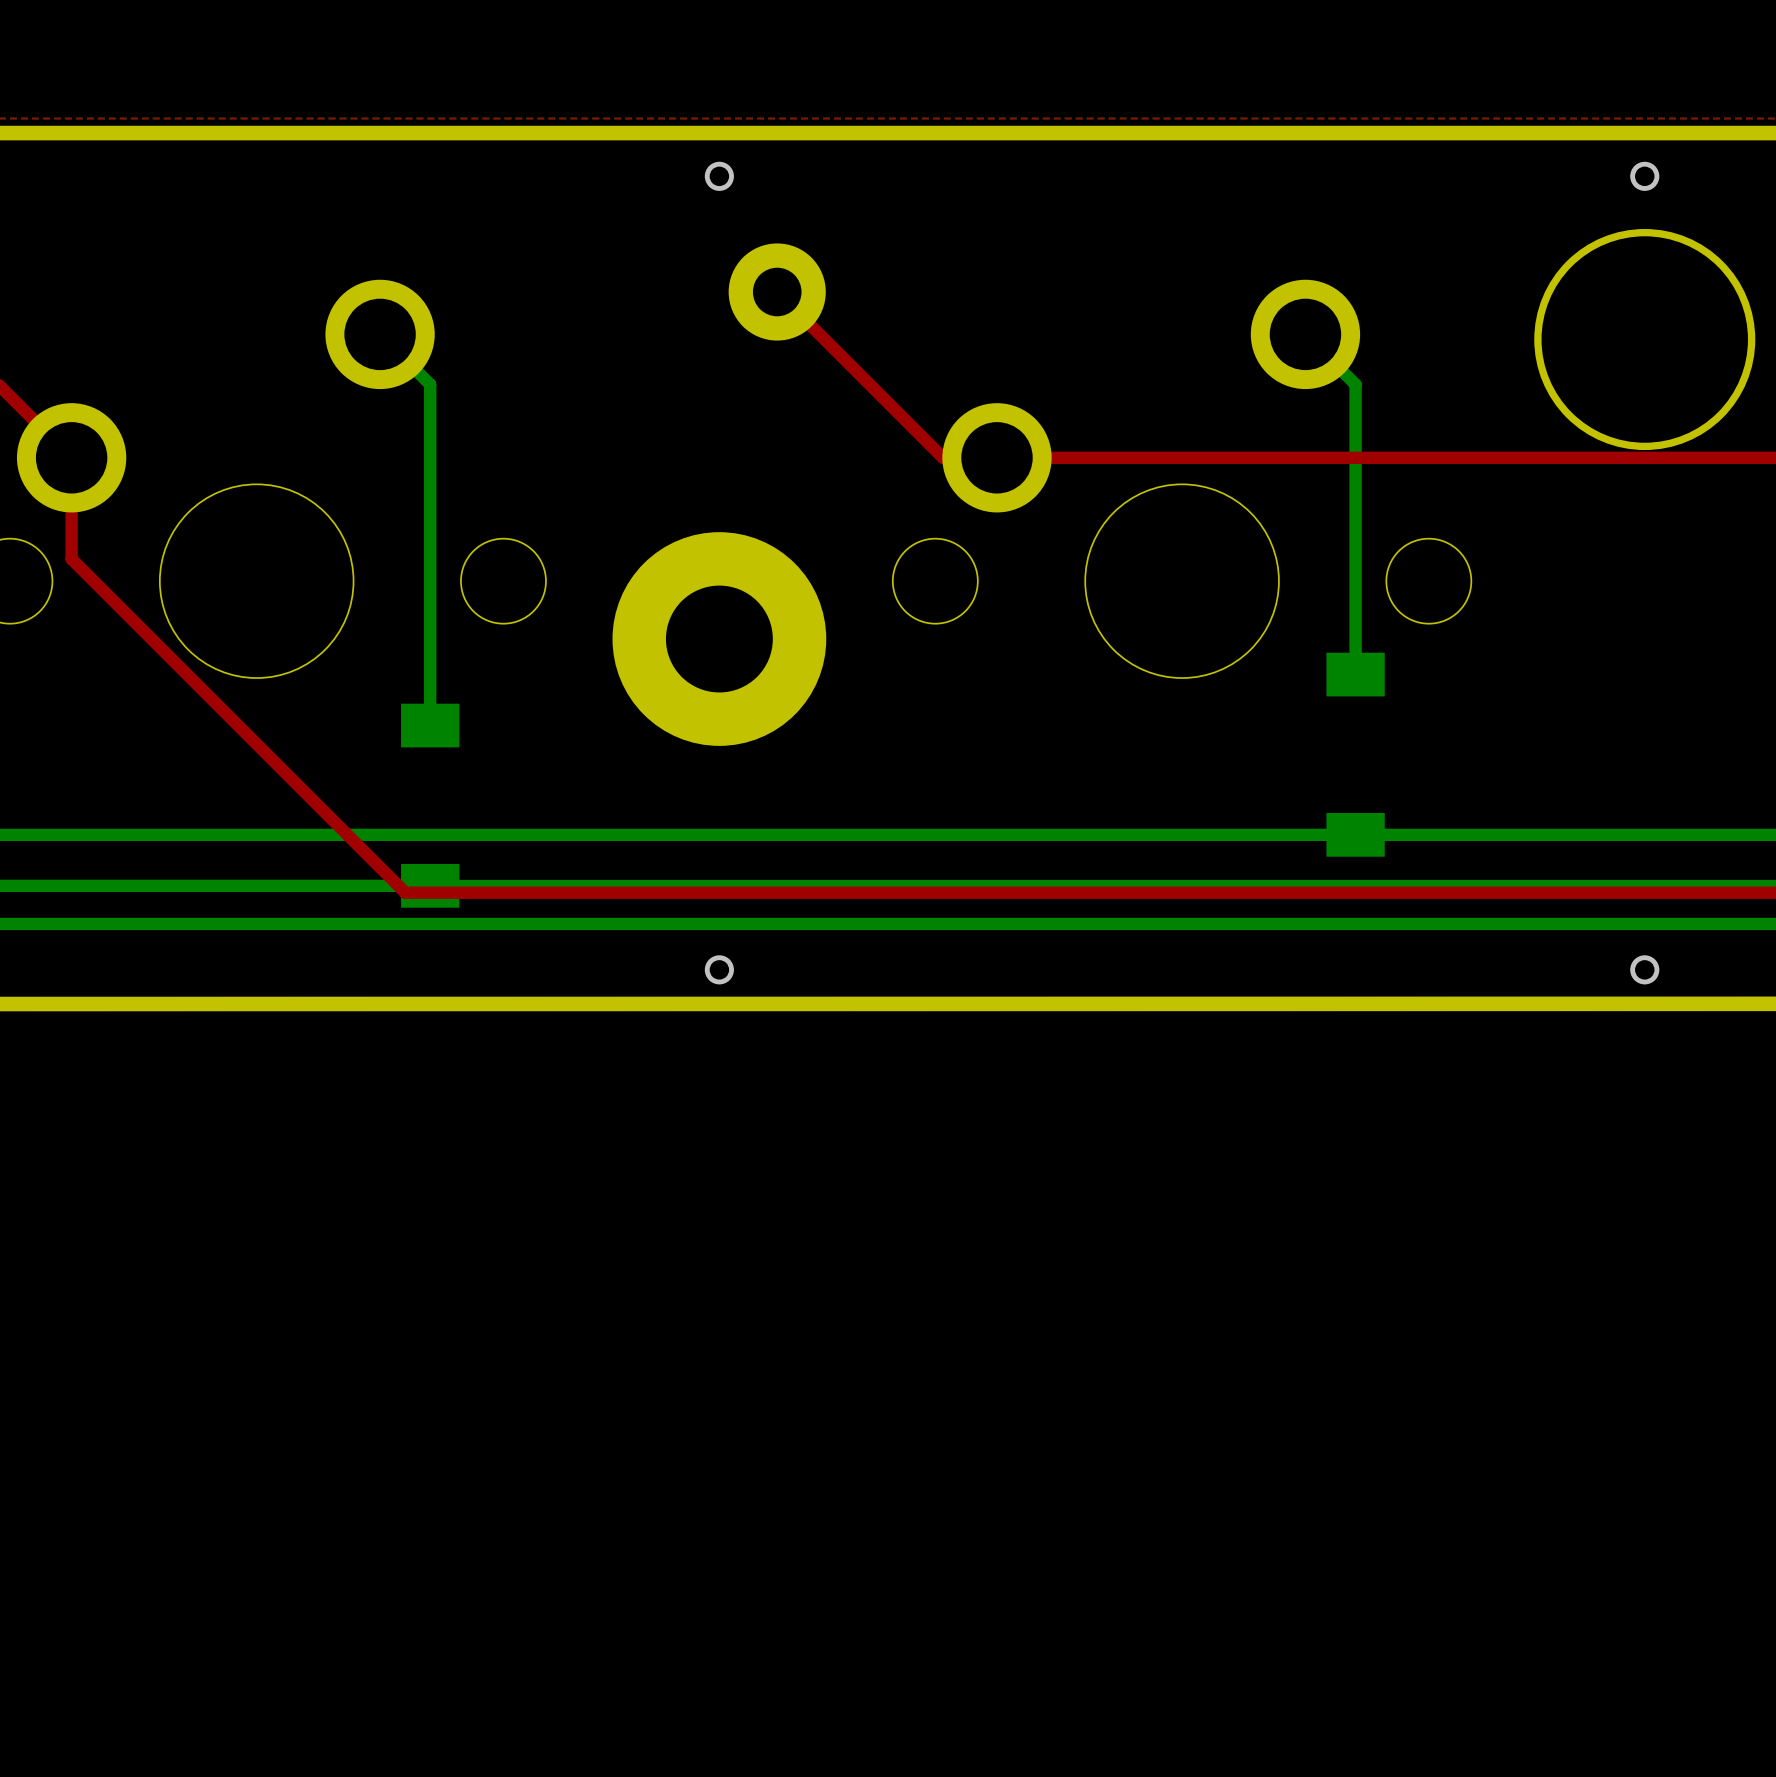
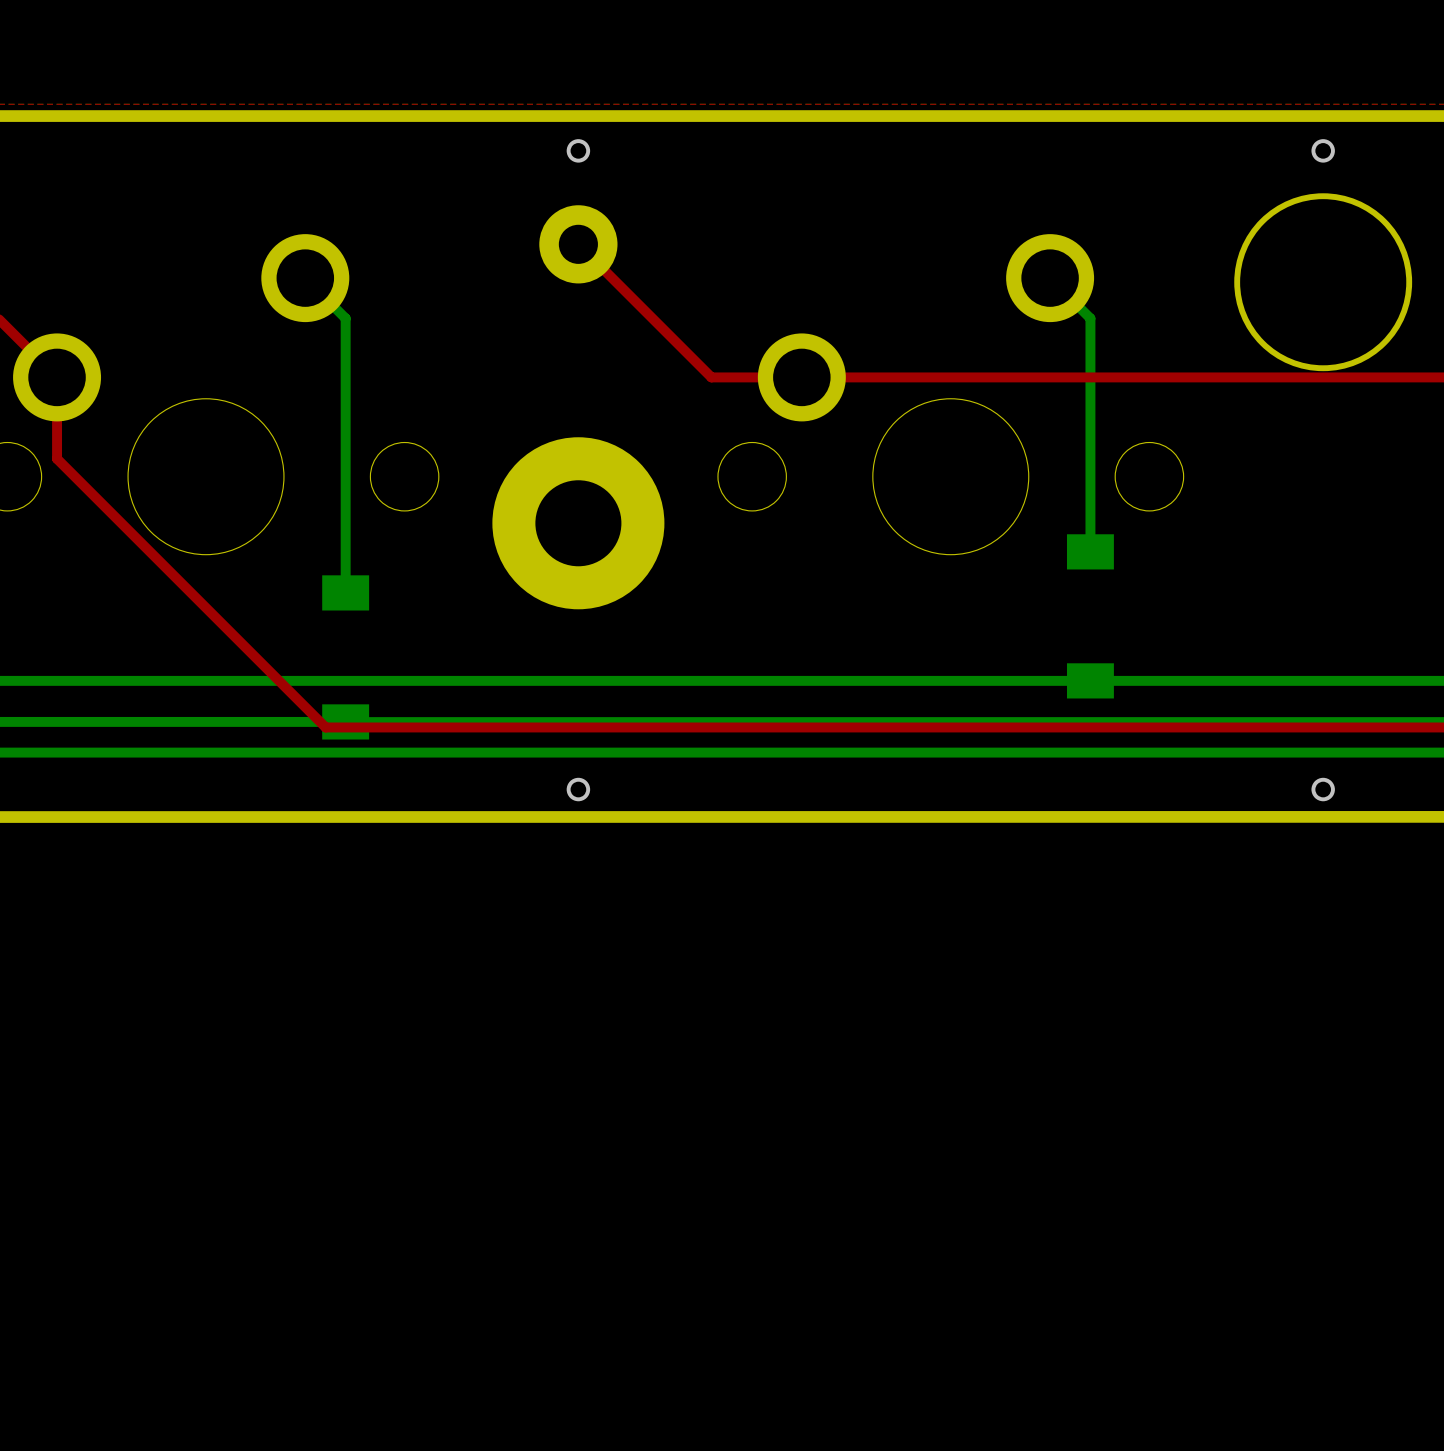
top track: (777, 292) (943, 457) -> (578, 244) (711, 377) (758, 377)
part position: (777, 292) -> (578, 244)

